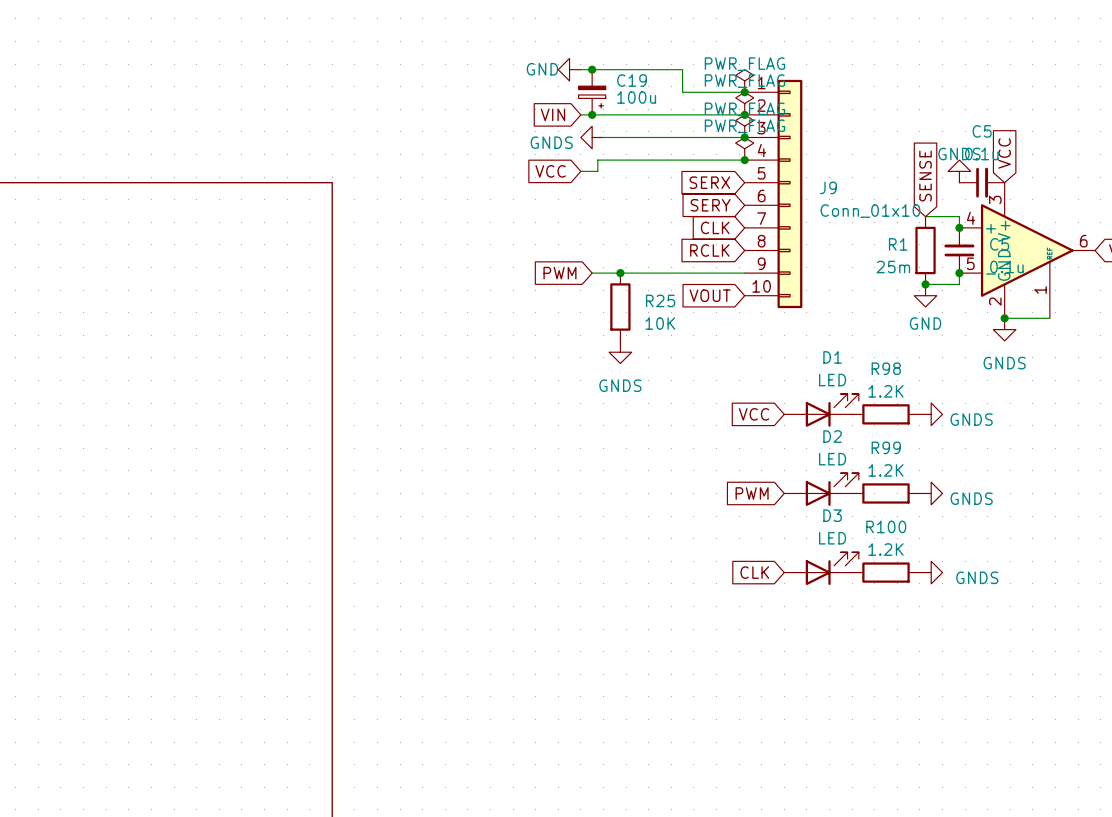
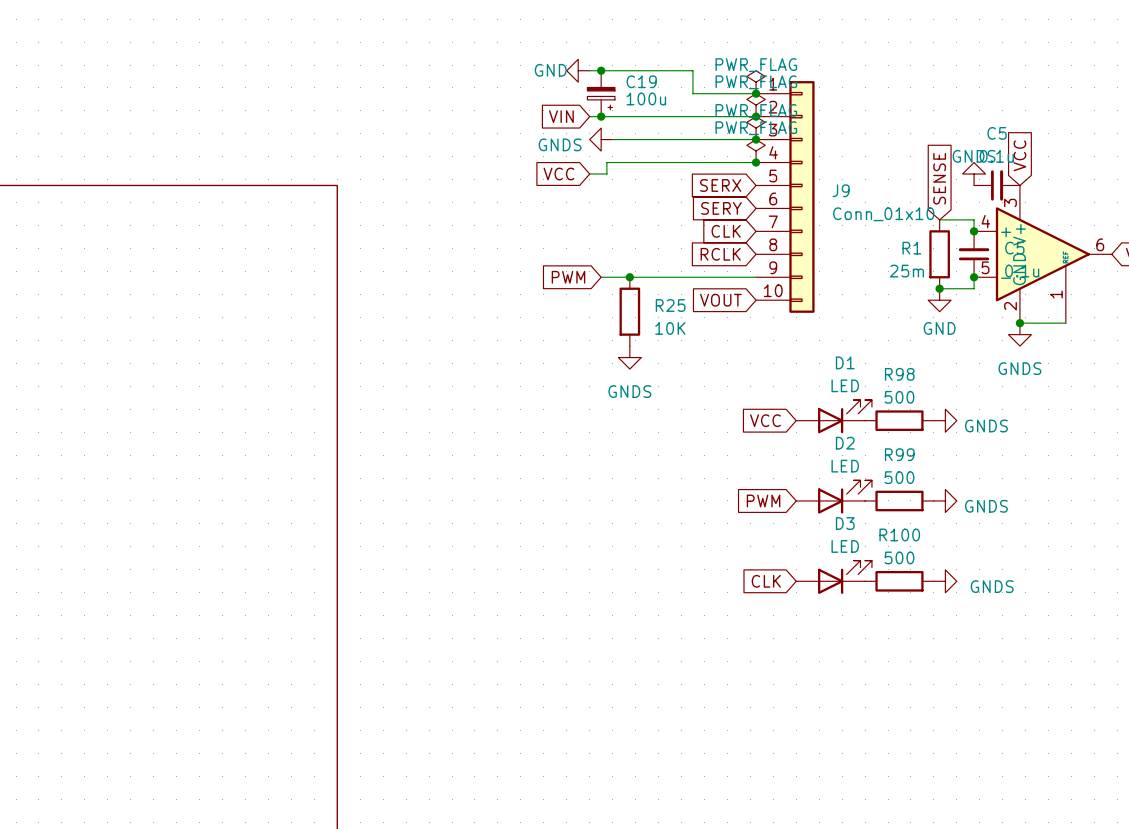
R98 value: 1.2K (885, 391) -> 500 (899, 397)
R99 value: 1.2K (885, 470) -> 500 (899, 477)
R100 value: 1.2K (885, 549) -> 500 (899, 557)

